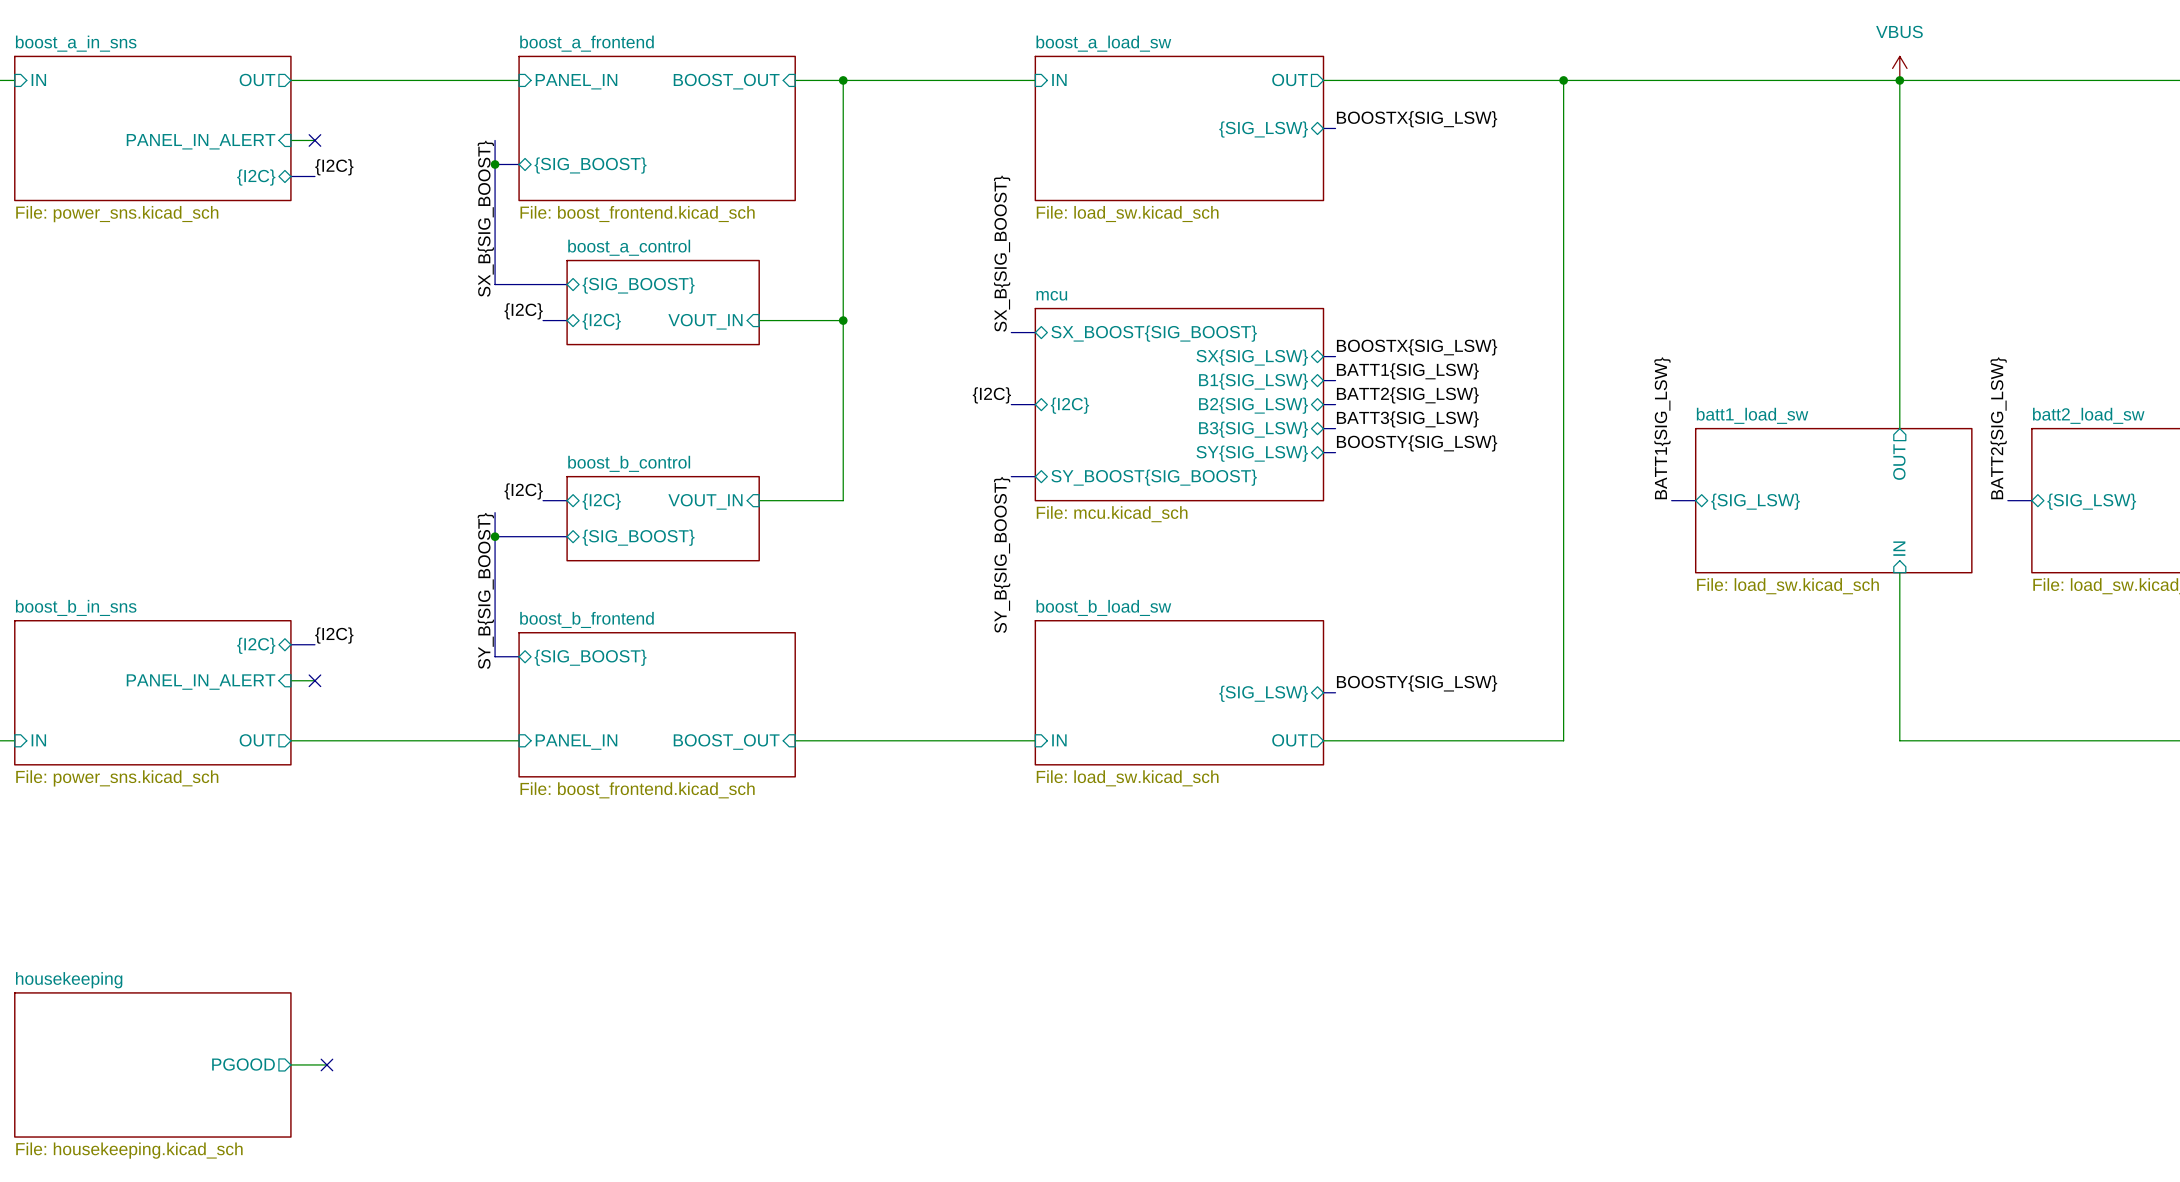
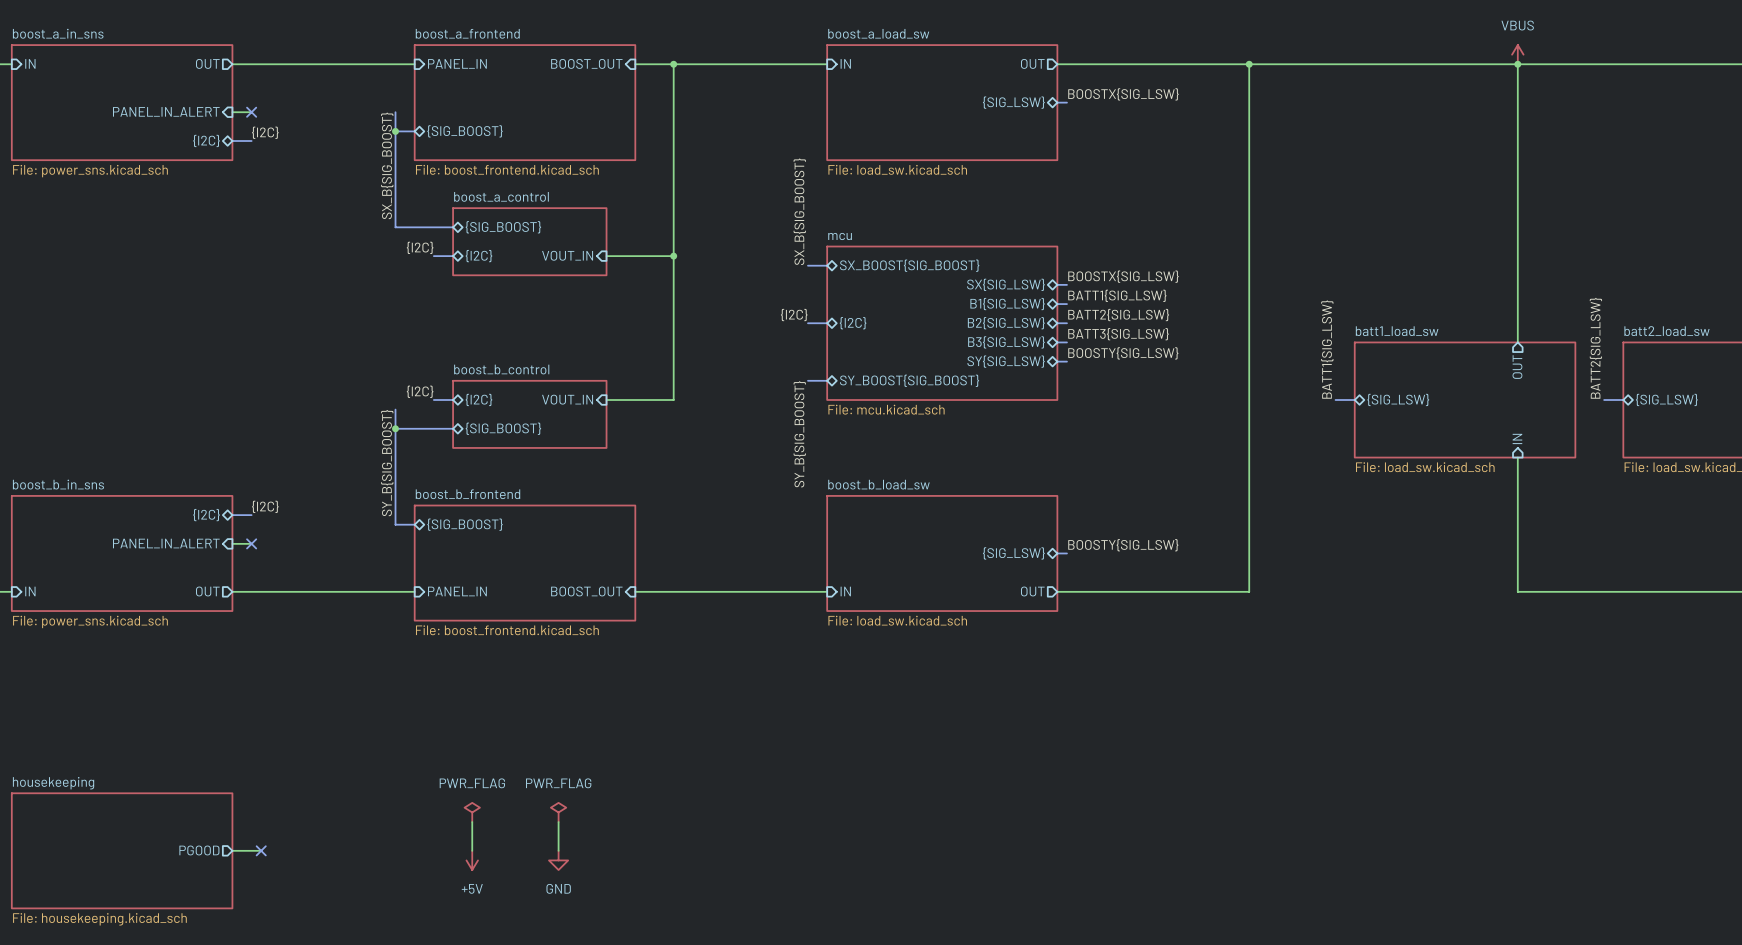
power symbol: none -> PWR_FLAG (472, 812)
power symbol: none -> PWR_FLAG (558, 812)
wire: none -> (472, 822) (472, 850)
wire: none -> (558, 822) (558, 850)
power symbol: none -> +5V (472, 860)
power symbol: none -> GND (558, 860)

